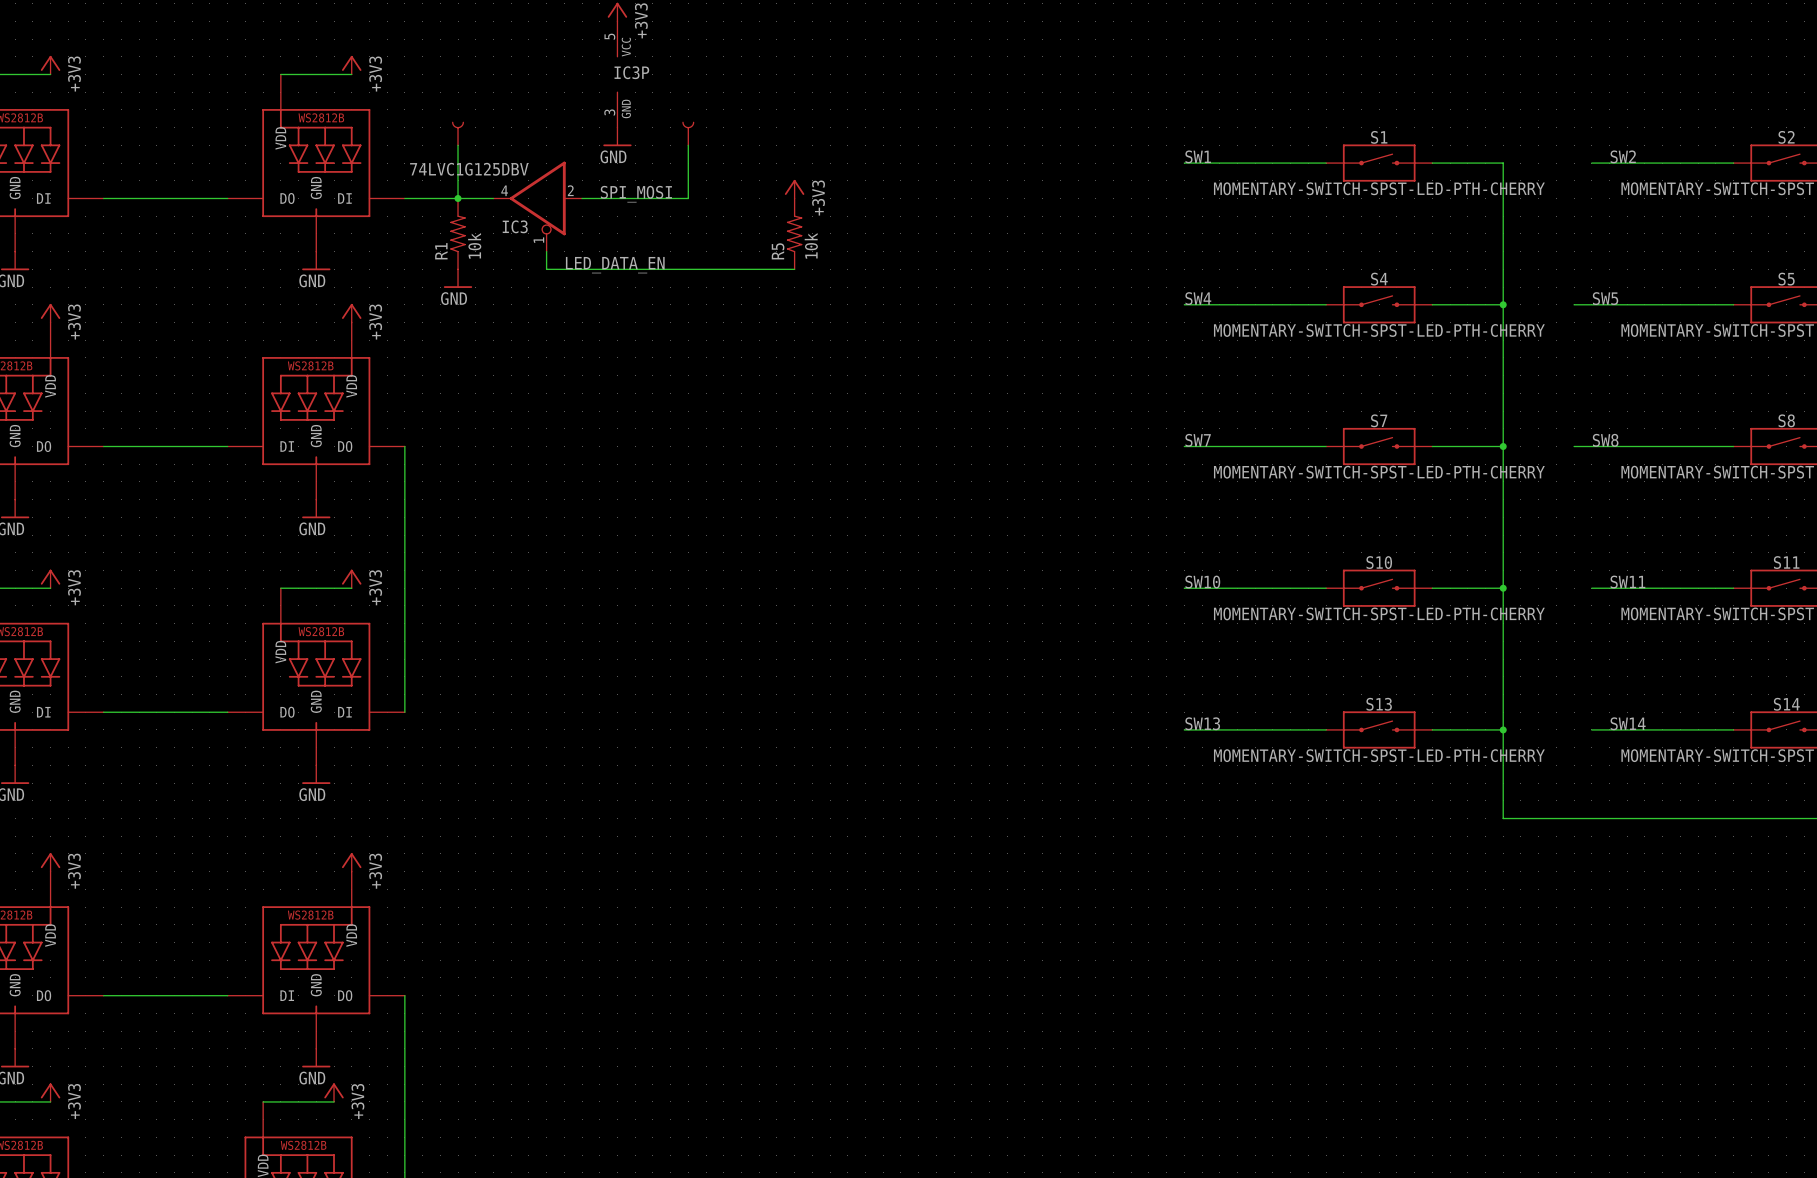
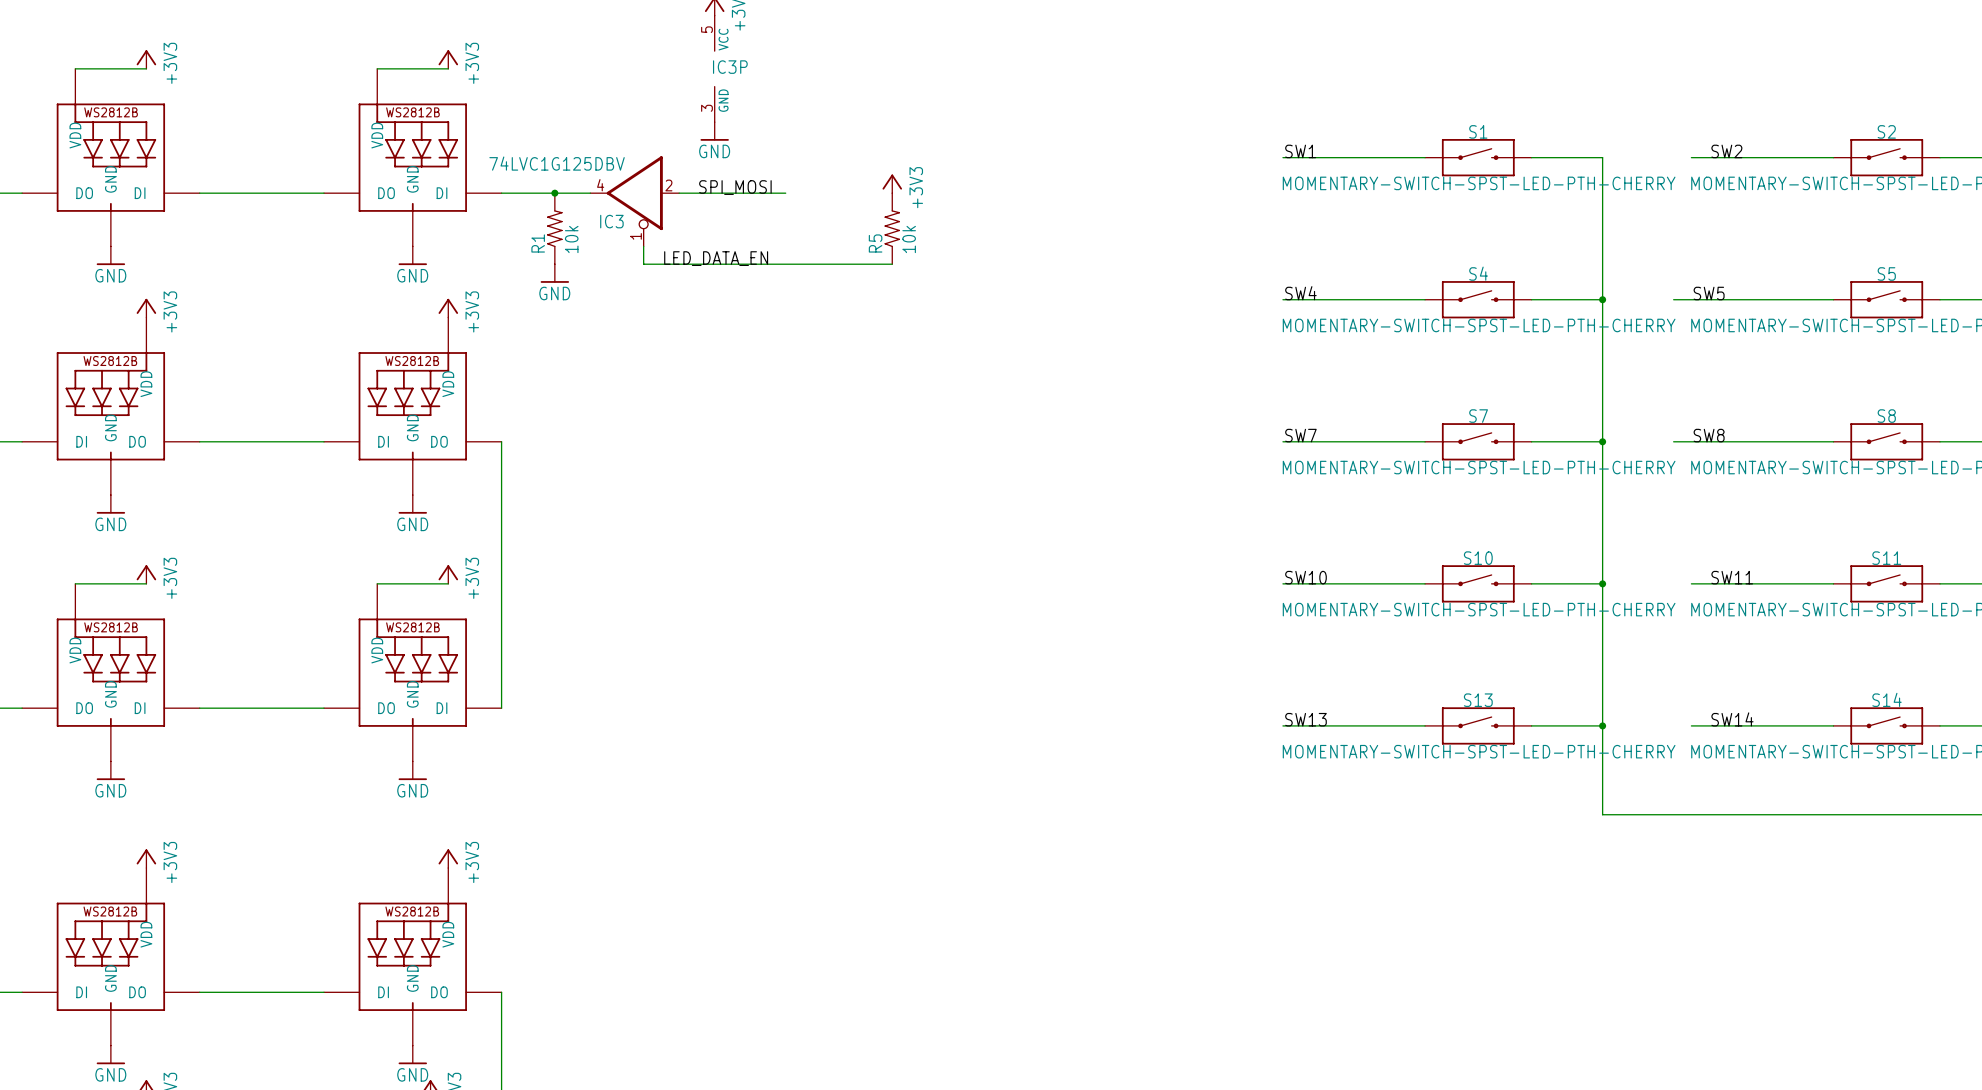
part: (458, 133) -> none
part: (688, 133) -> none
wire: (458, 145) (458, 198) -> none
wire: (688, 145) (688, 198) -> none

